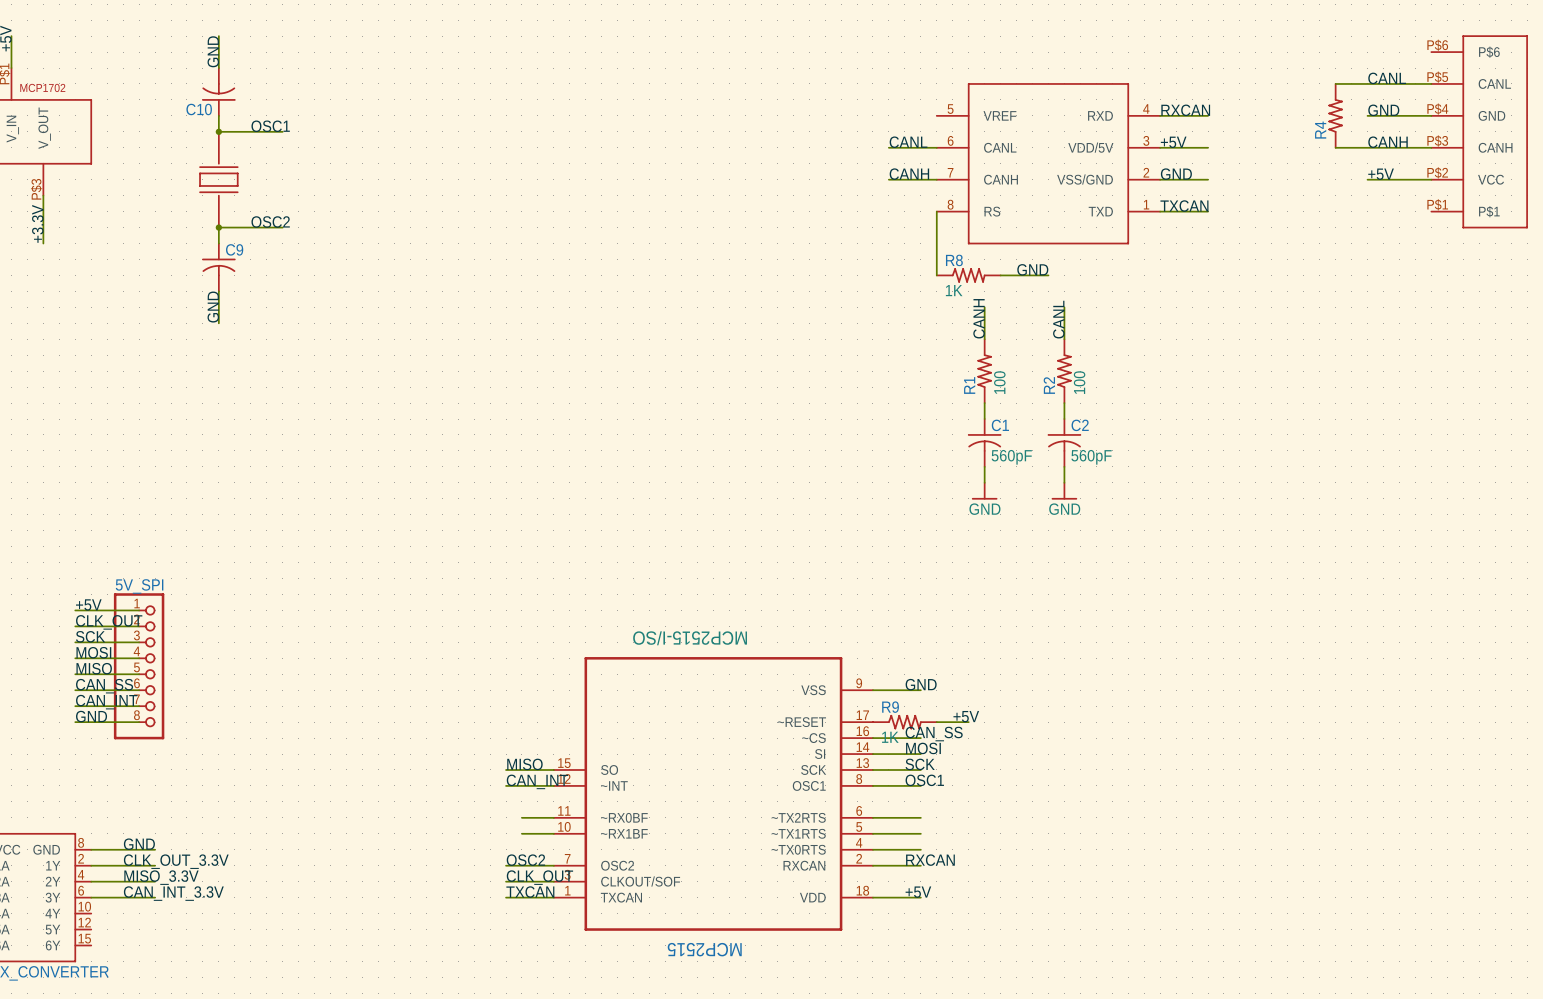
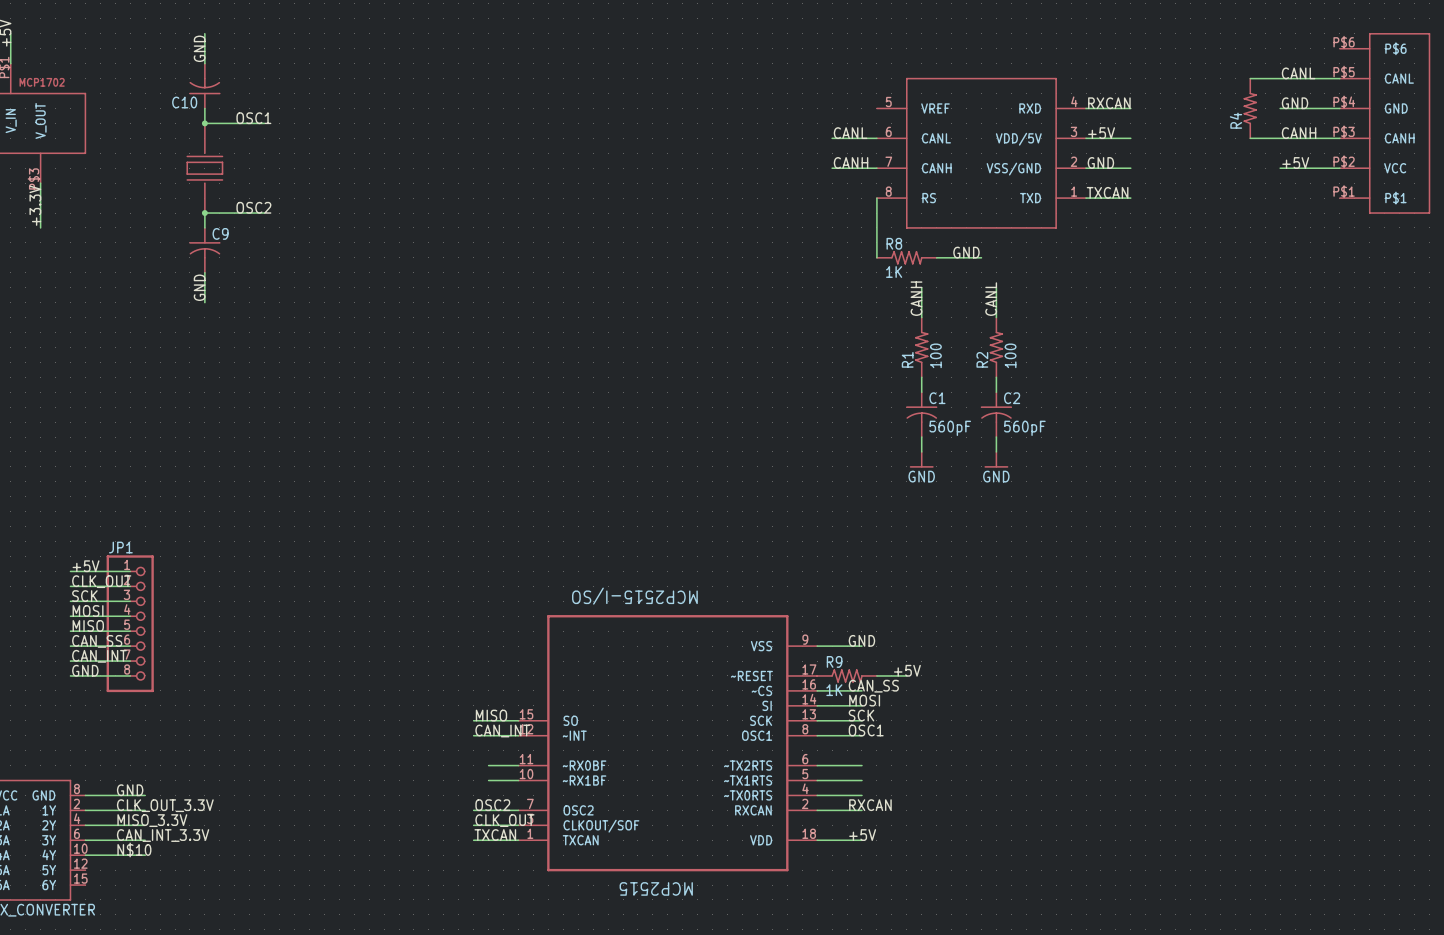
5V_SPI name: 5V_SPI (139, 586) -> JP1 (120, 547)
label: none -> N$10 (134, 849)
wire: none -> (85, 855) (145, 855)

